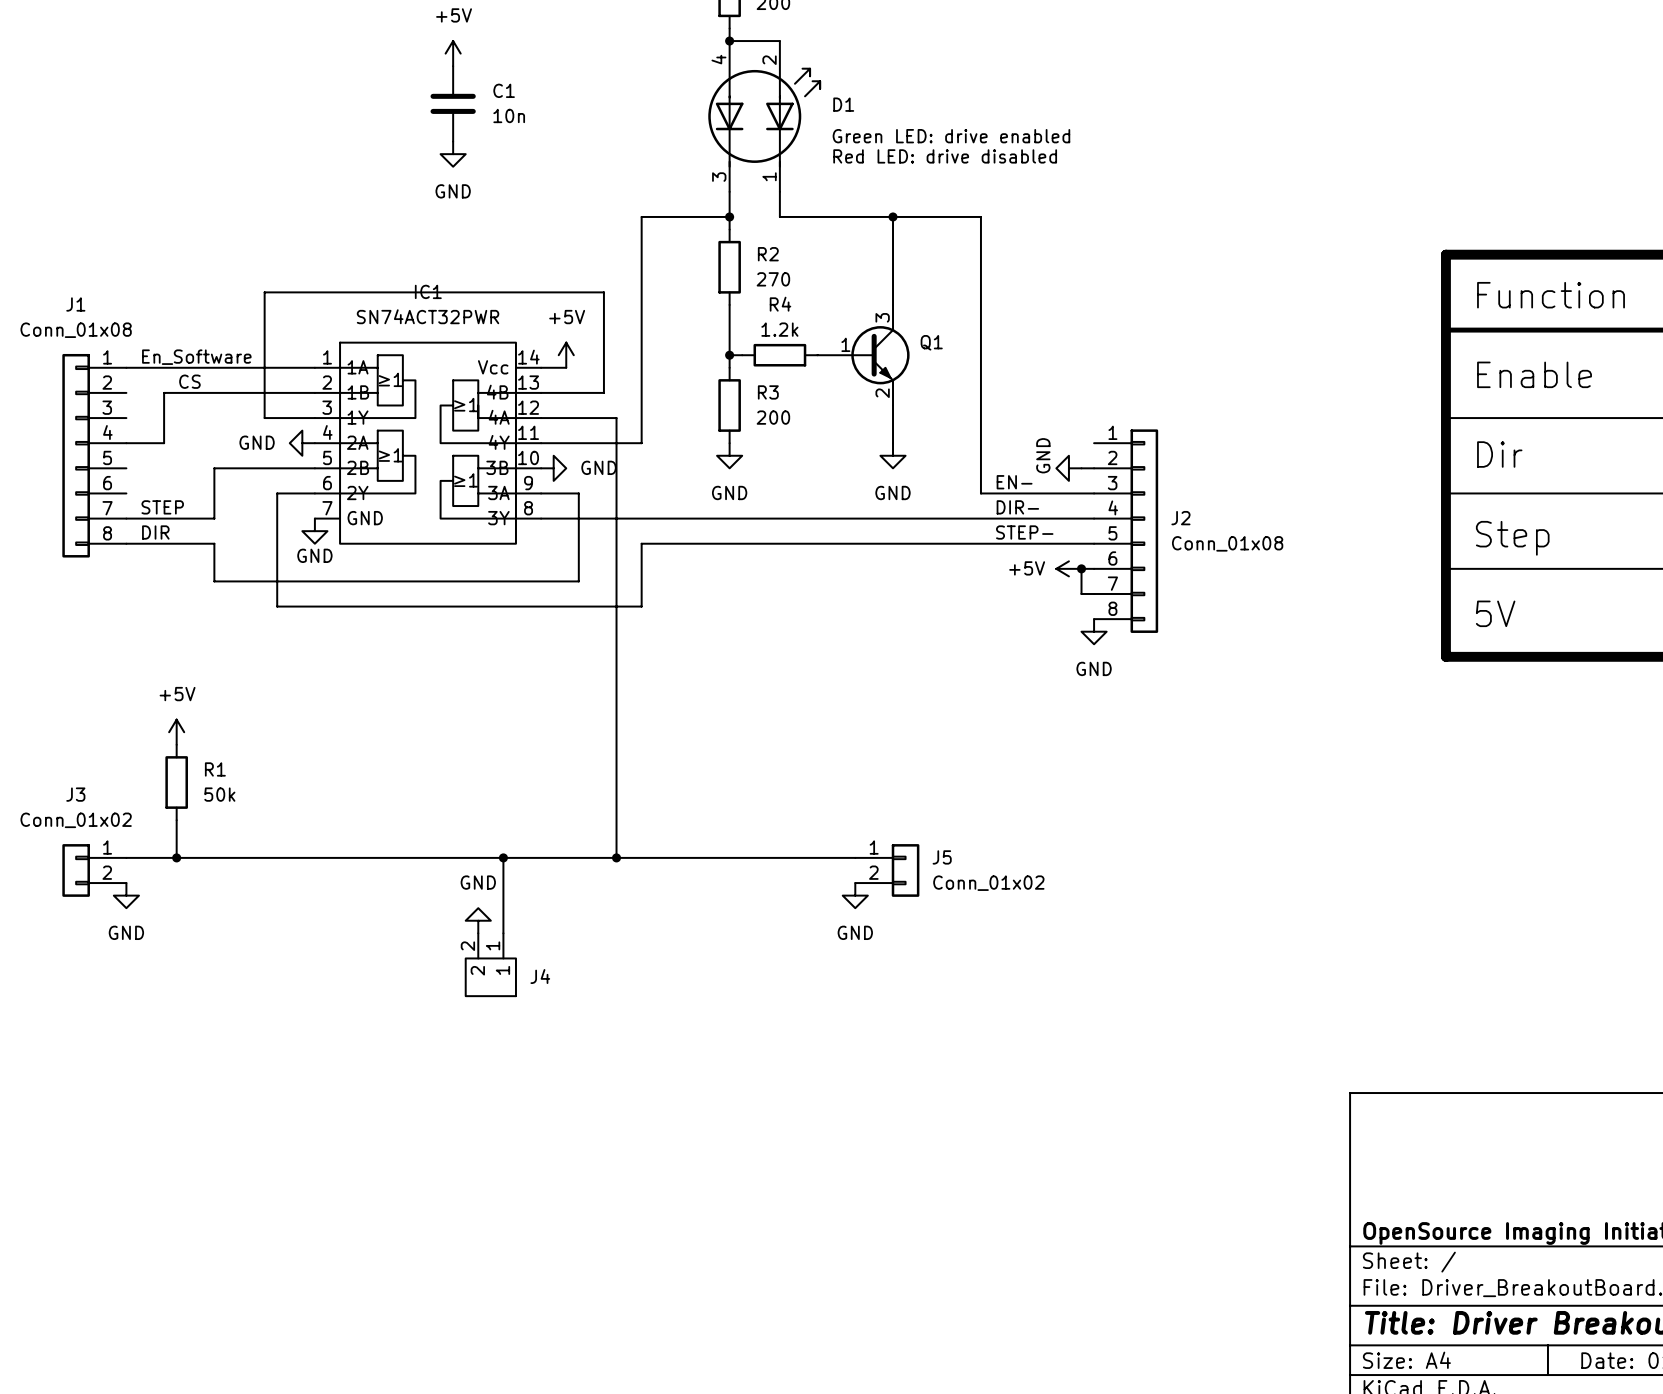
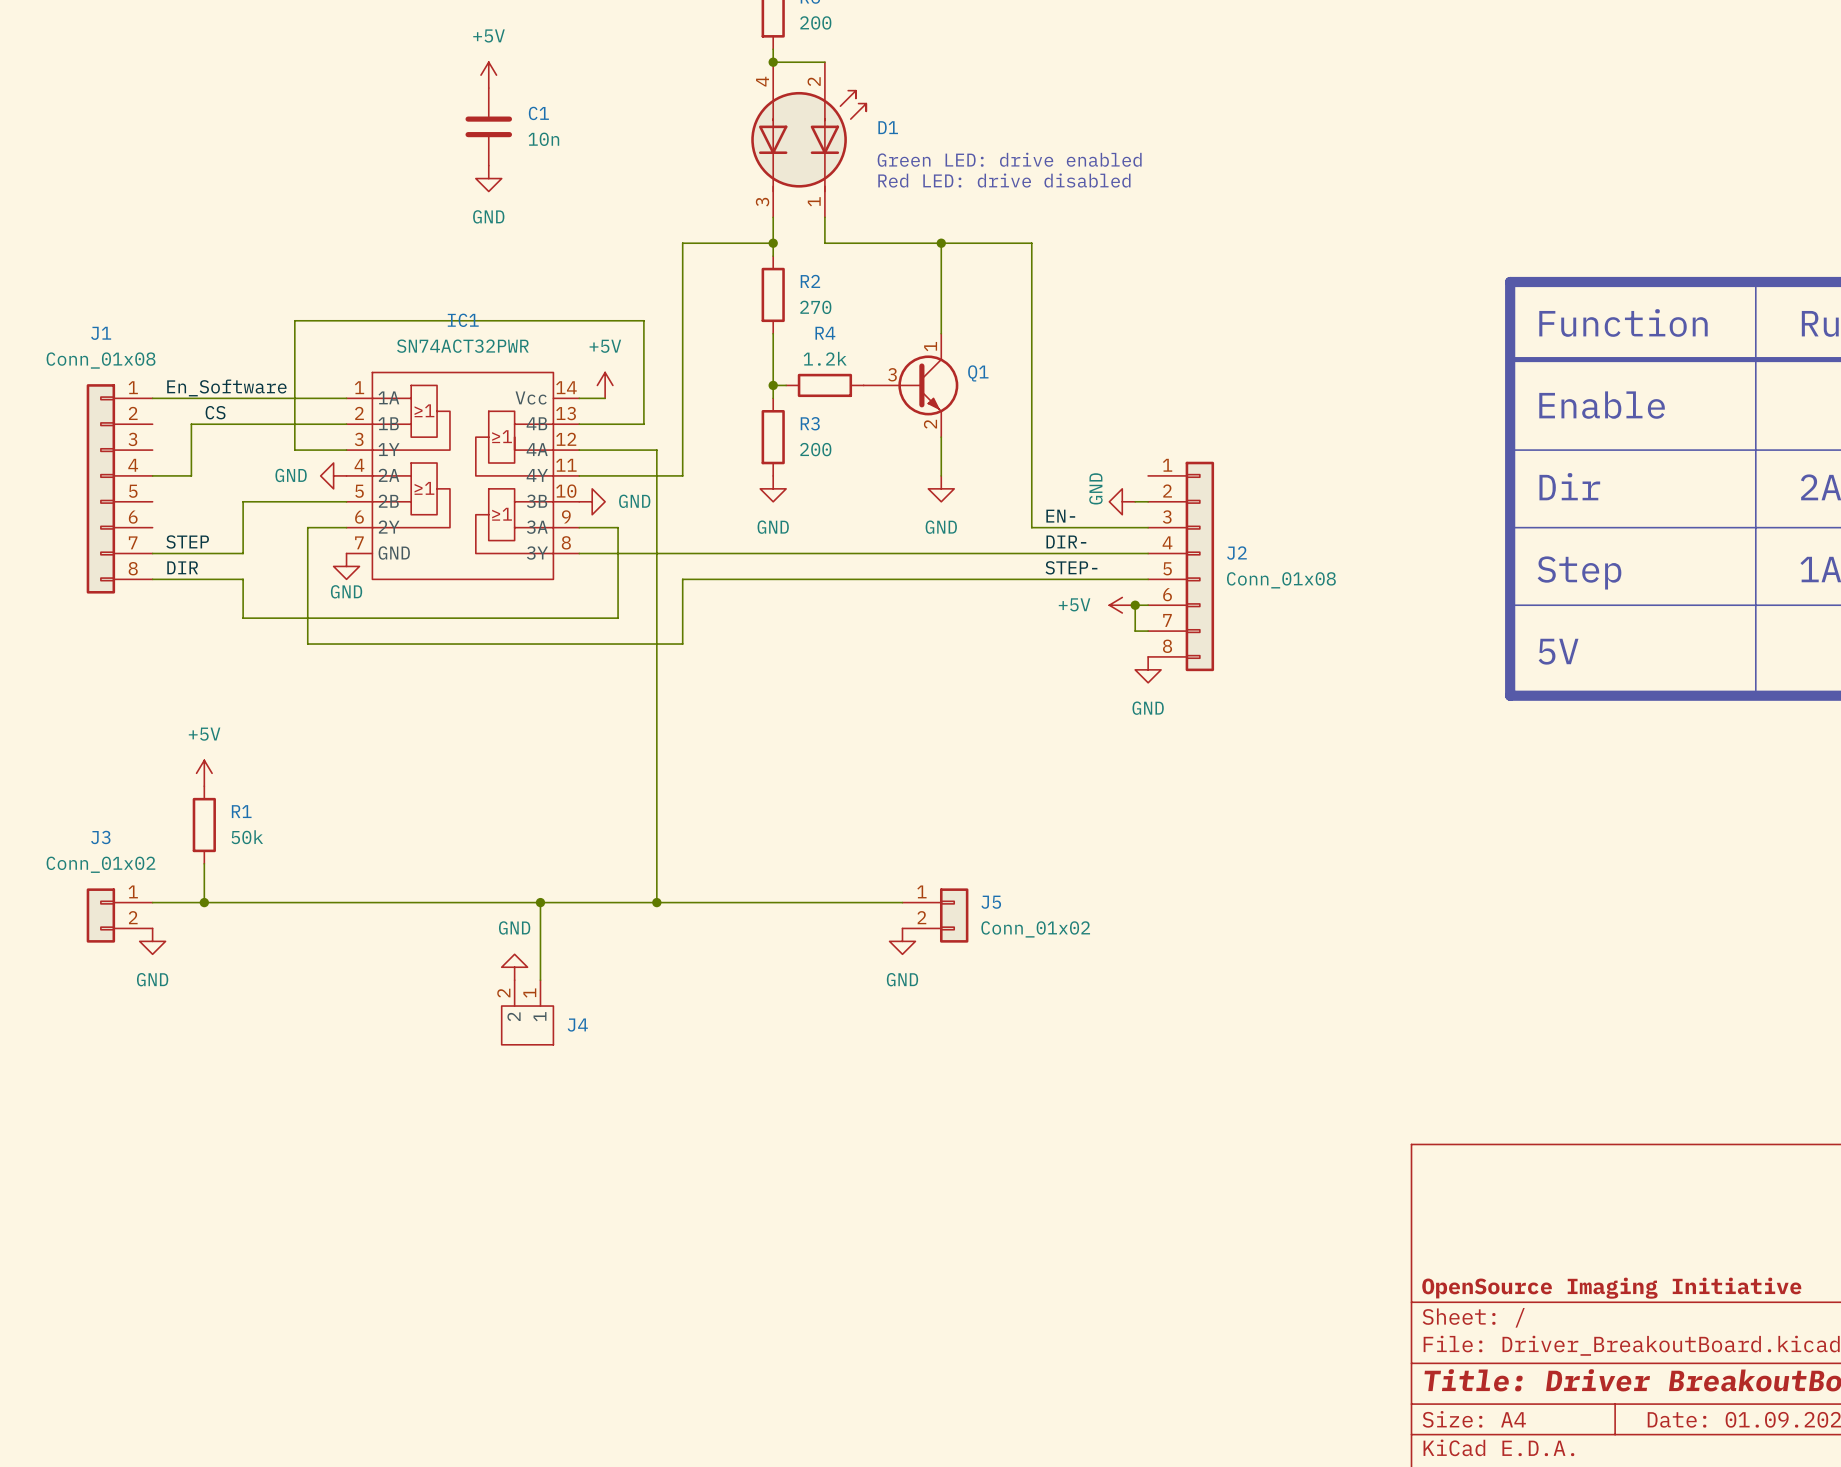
Q1 pin number: 3 (882, 317) -> 1 (930, 346)
Q1 pin number: 1 (845, 344) -> 3 (892, 374)

